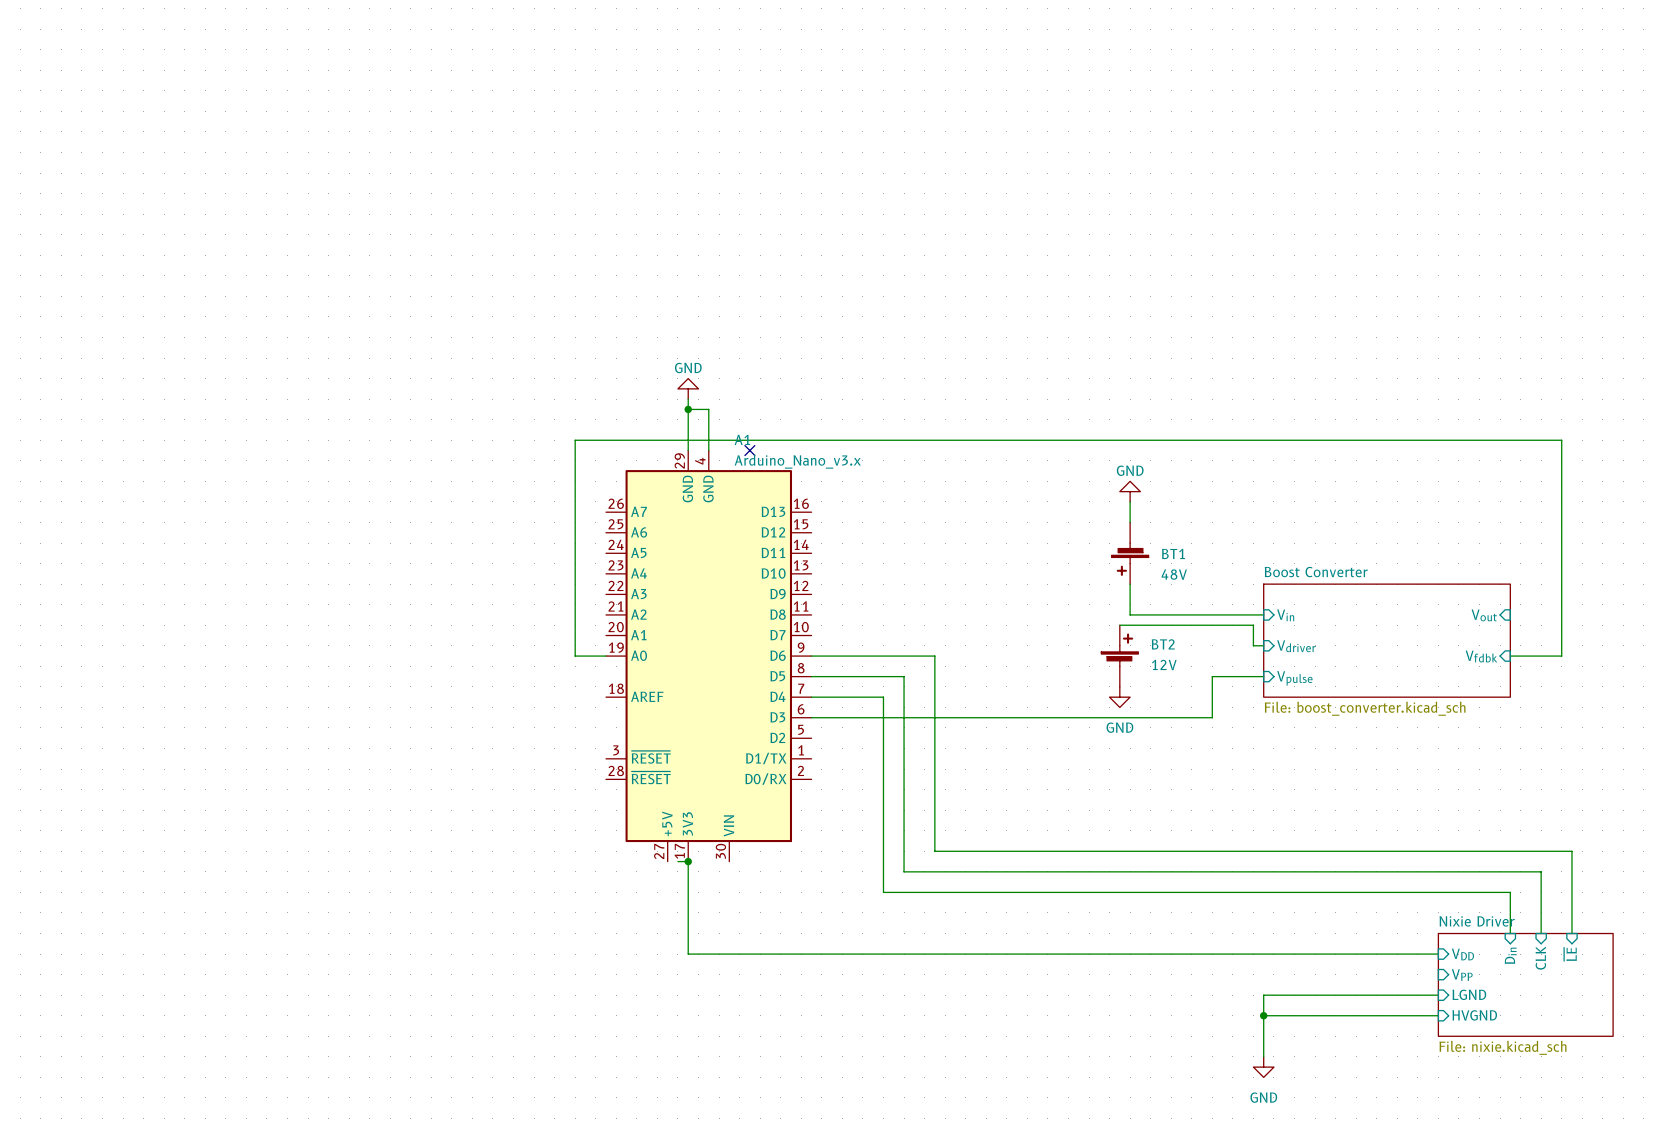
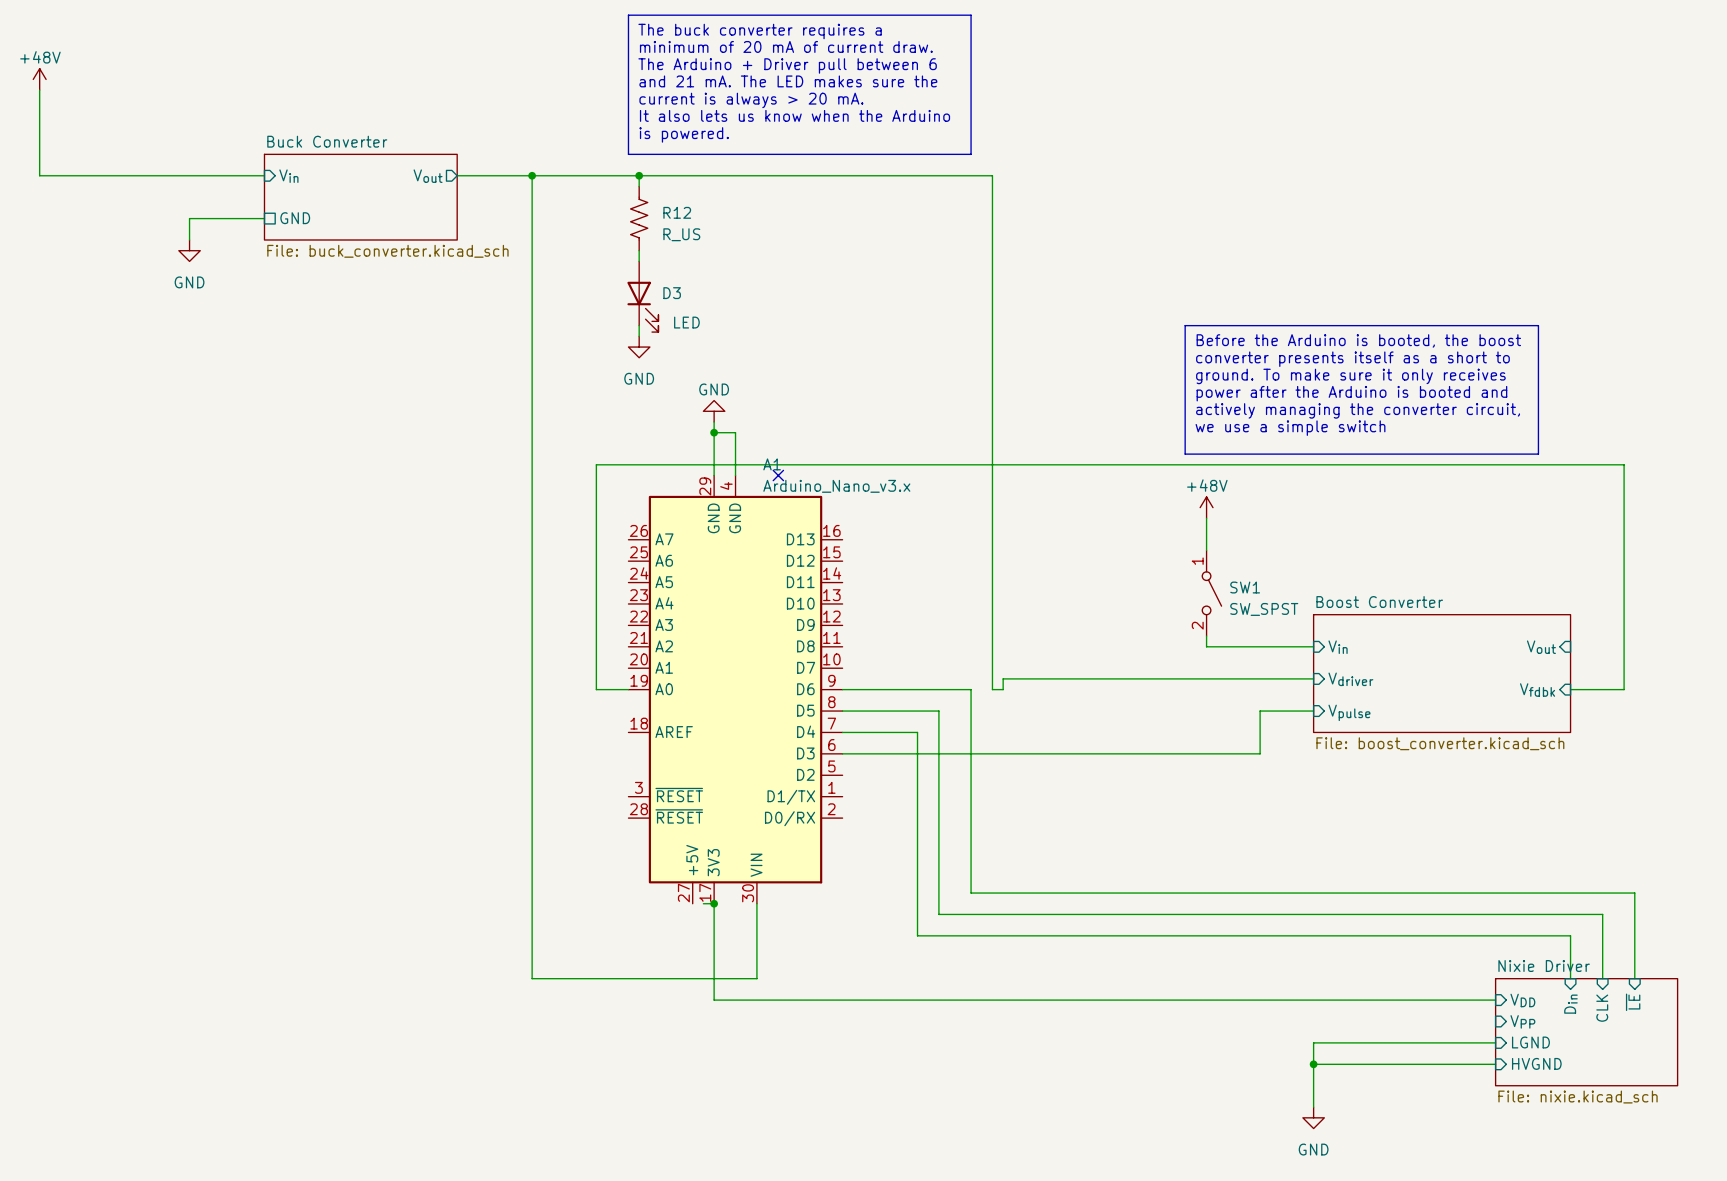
line: none -> (628, 15) (971, 15) (971, 154) (628, 154) (628, 15)
text: none -> The buck converter requires a (760, 31)
text: none -> minimum of 20 mA of current draw. (786, 46)
text: none -> The Arduino + Driver pull between 6 (787, 65)
power symbol: none -> +48V (39, 79)
text: none -> and 21 mA. The LED makes sure the (788, 81)
wire: none -> (39, 90) (39, 175) (264, 175)
text: none -> current is always > 20 mA. (751, 100)
text: none -> It also lets us know when the Arduino (795, 115)
text: none -> is powered. (684, 134)
wire: none -> (532, 175) (532, 978) (756, 978) (756, 903)
junction: none -> (532, 175)
wire: none -> (639, 175) (639, 186)
junction: none -> (639, 175)
sheet pin: none -> Vin (288, 176)
sheet pin: none -> Vout (428, 176)
sheet Buck Converter: none -> File: buck_converter.kicad_sch (360, 197)
wire: none -> (264, 218) (189, 218) (189, 239)
sheet pin: none -> GND (295, 218)
R12: none -> R_US (639, 218)
power symbol: none -> GND (189, 250)
wire: none -> (639, 250) (639, 261)
D3: none -> LED (642, 296)
wire: none -> (639, 325) (639, 336)
line: none -> (1185, 325) (1538, 325) (1538, 454) (1185, 454) (1185, 325)
text: none -> Before the Arduino is booted, the boost (1358, 340)
power symbol: none -> GND (639, 347)
text: none -> converter presents itself as a short to (1352, 359)
text: none -> ground. To make sure it only receives (1350, 376)
text: none -> power after the Arduino is booted and (1351, 393)
text: none -> actively managing the converter circuit, (1358, 410)
text: none -> we use a simple switch (1290, 428)
power symbol: none -> +48V (1206, 507)
power symbol: GND (1130, 491) -> none
wire: none -> (1206, 518) (1206, 550)
wire: (1130, 501) (1130, 522) -> none
BT1: 48V (1130, 553) -> none
SW1: none -> SW_SPST (1211, 593)
wire: (1130, 584) (1130, 614) (1160, 614) -> (1206, 636) (1206, 646)
wire: (1119, 625) (1253, 625) (1253, 645) -> (457, 175) (992, 175) (992, 689) (1003, 689) (1003, 678) (1302, 678)
BT2: 12V (1119, 656) -> none
power symbol: GND (1119, 697) -> none

